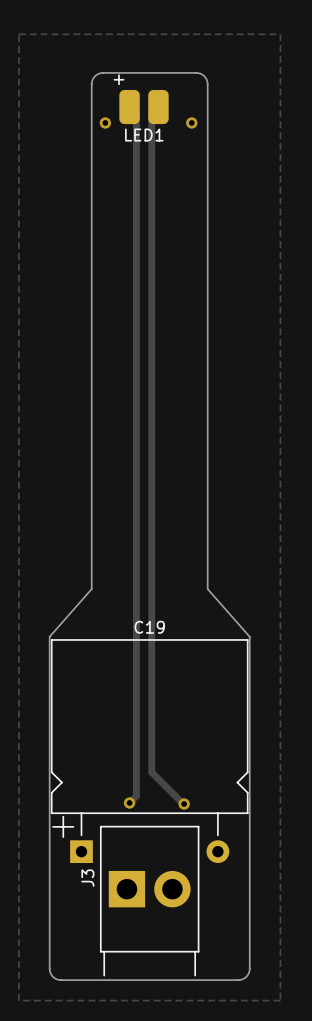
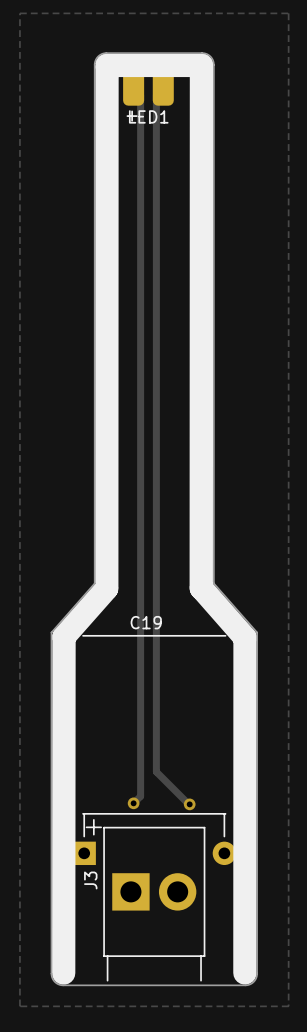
line: (119, 75) (119, 84) -> (132, 111) (132, 120)
line: (114, 79) (123, 79) -> (127, 116) (136, 116)
line: none -> (106, 588) (106, 65) (201, 65) (201, 588)
line: none -> (201, 588) (245, 637) (244, 972)
line: none -> (106, 588) (63, 636) (63, 973)
C19 footprint: [51, 639, 249, 864] -> [72, 635, 237, 866]

